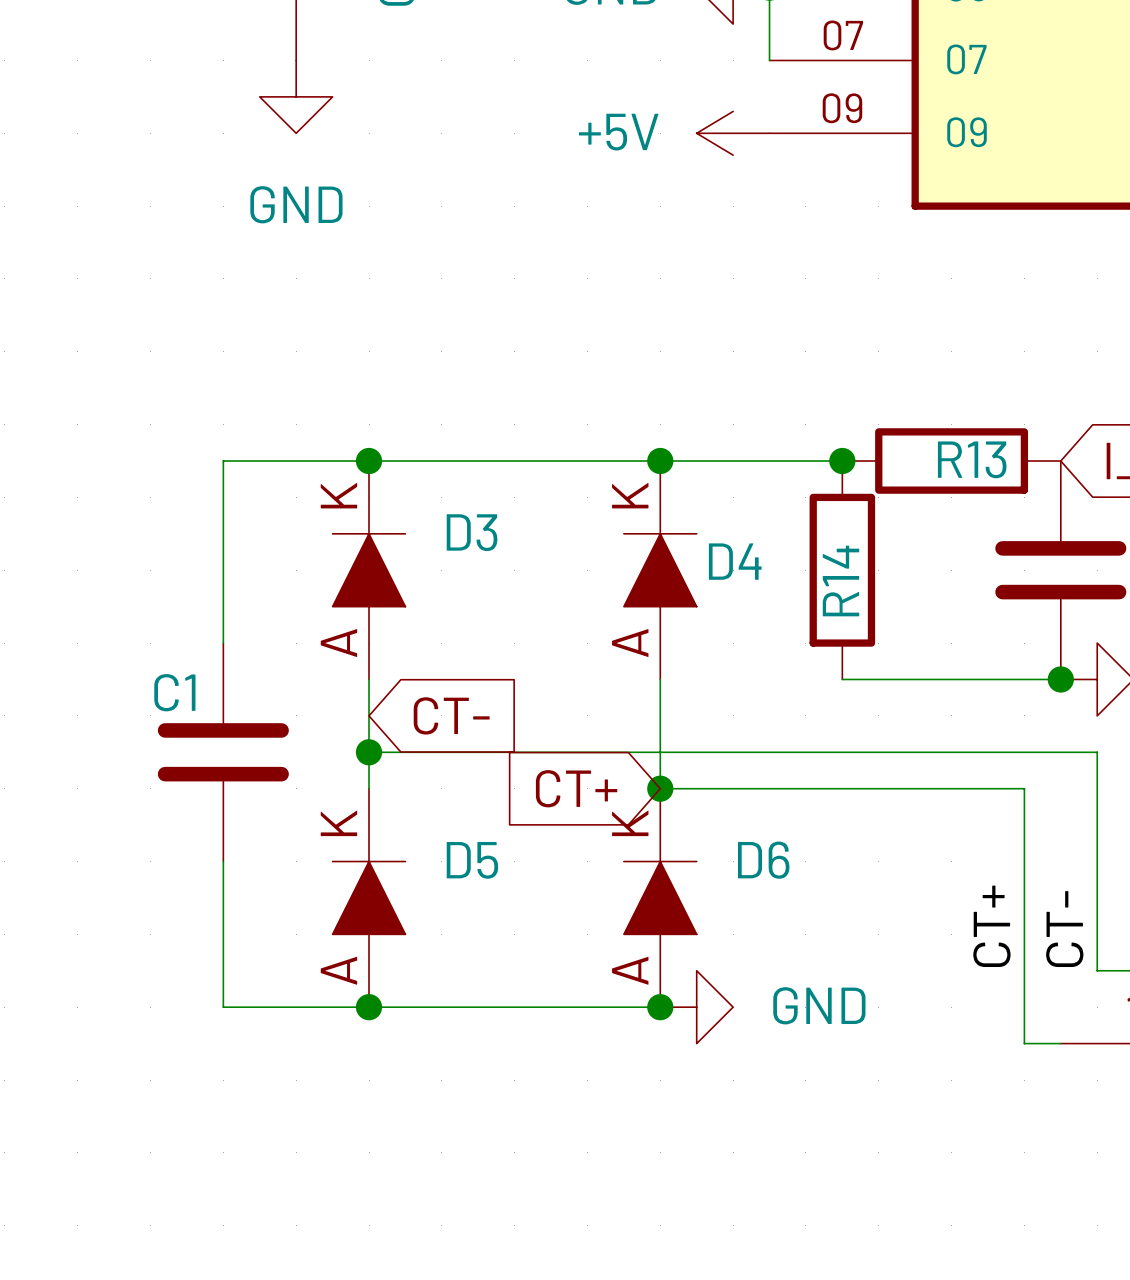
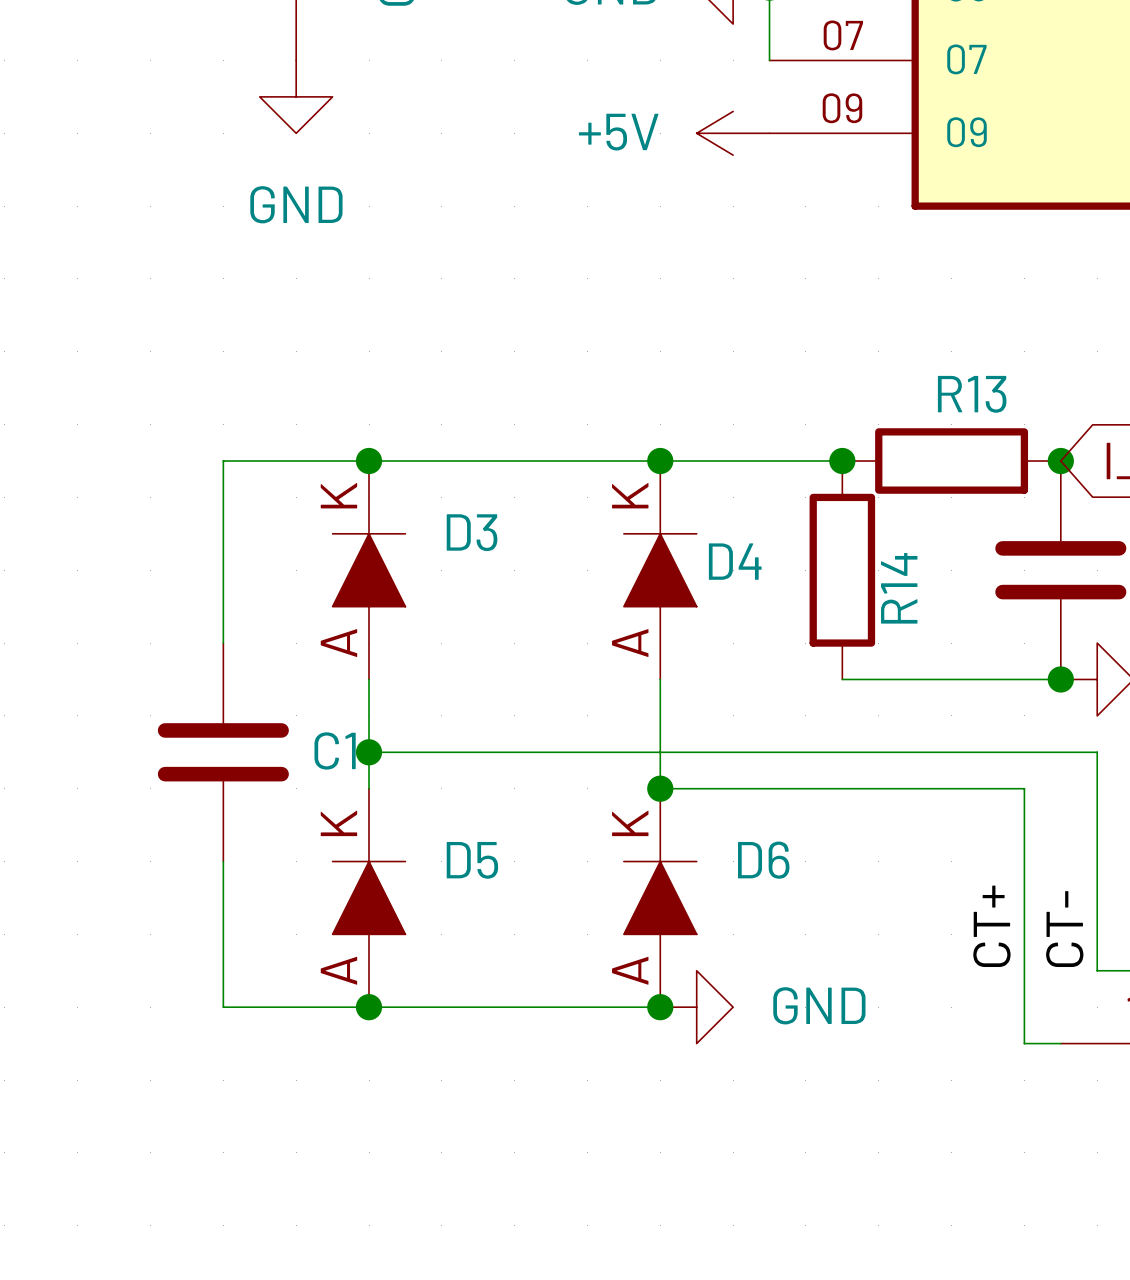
R13 name position: R13 (972, 459) -> R13 (972, 394)
junction: none -> (1060, 461)
R14 name position: R14 (840, 581) -> R14 (899, 588)
C1 name position: C1 (174, 692) -> C1 (335, 750)
global label: CT- (451, 715) -> none
global label: CT+ (576, 788) -> none

